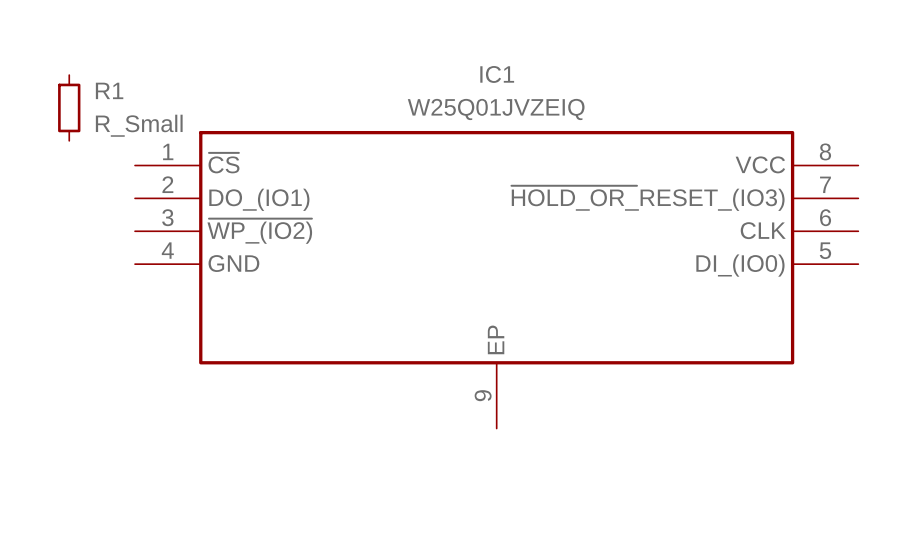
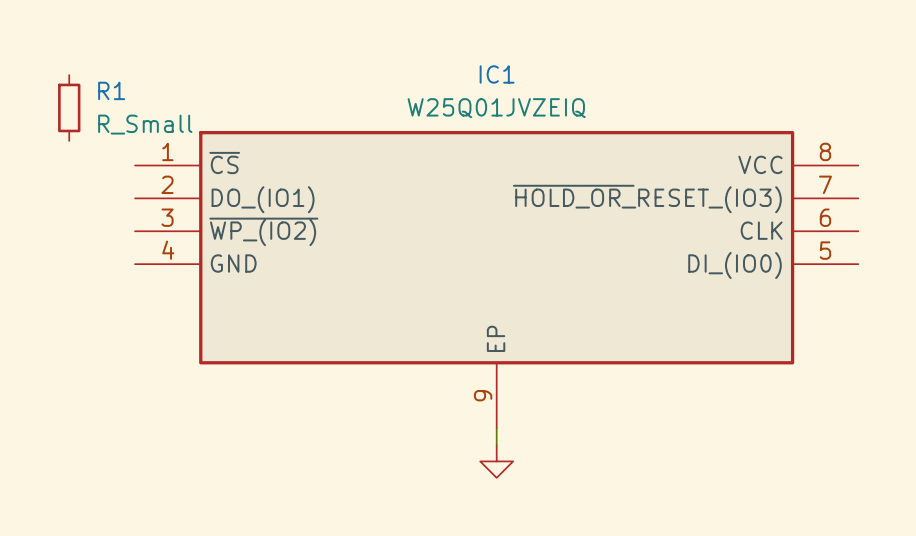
wire: none -> (496, 428) (496, 444)
power symbol: none -> (496, 461)

